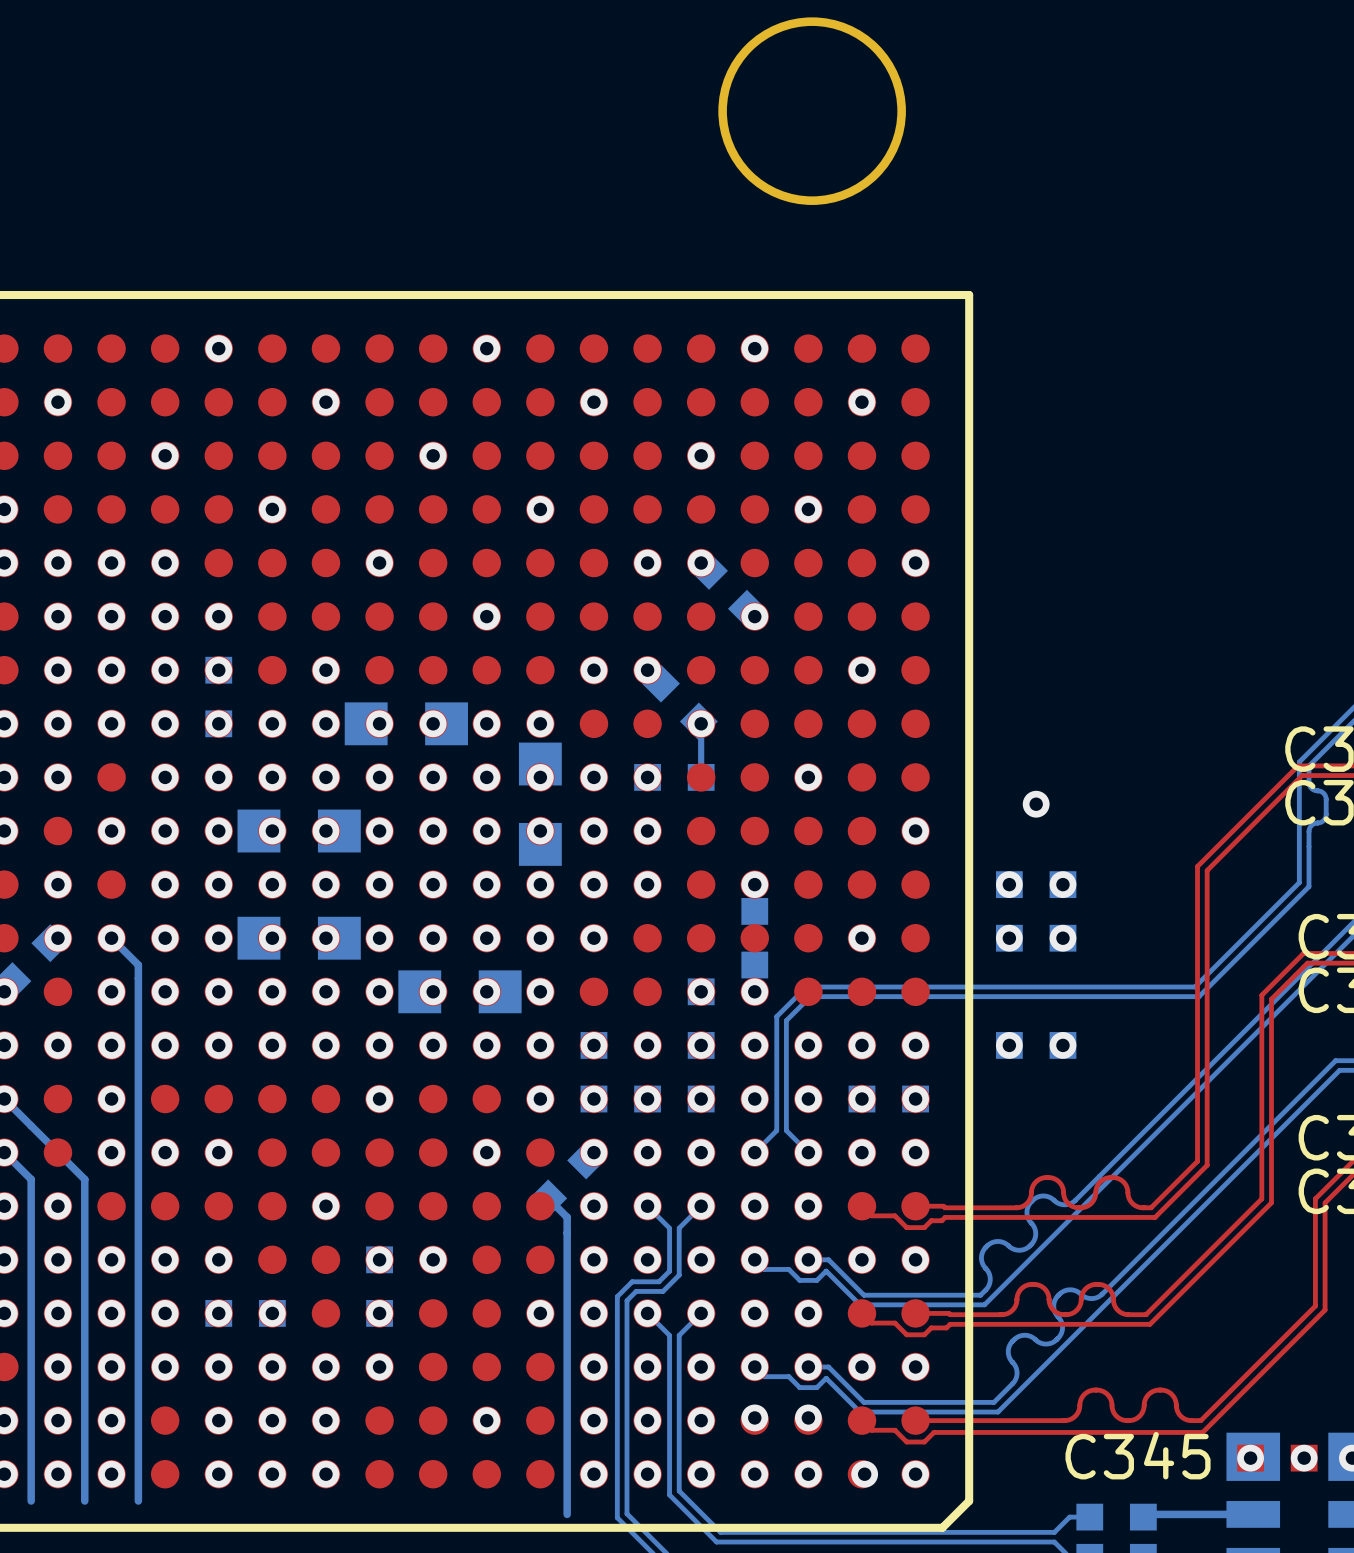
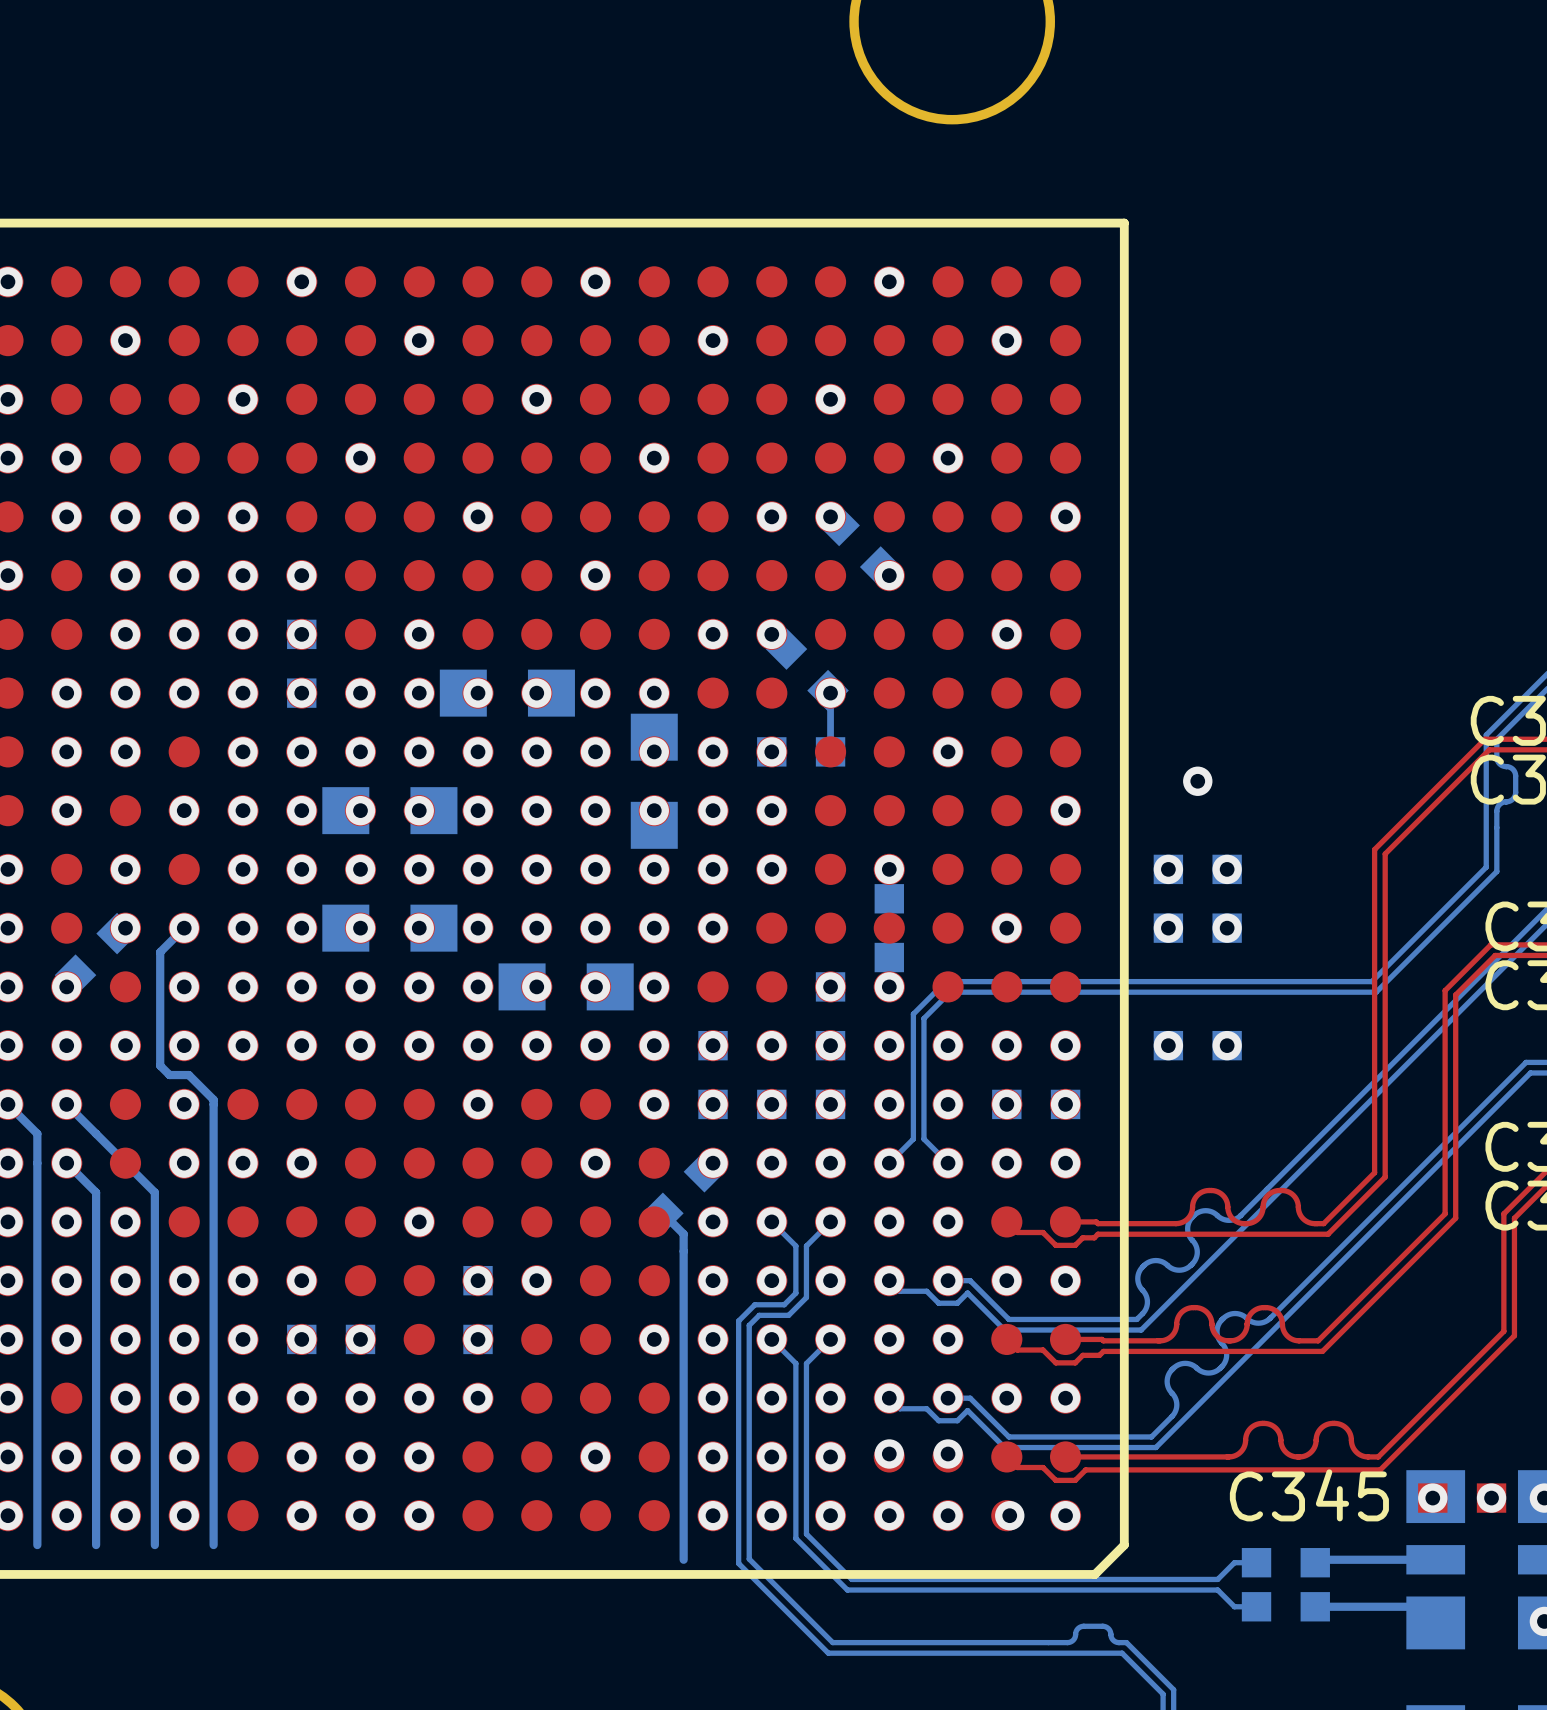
bottom track: (111, 938) (138, 965) (138, 1094) -> (184, 928) (160, 952) (160, 1065) (169, 1075) (188, 1075) (213, 1099)

